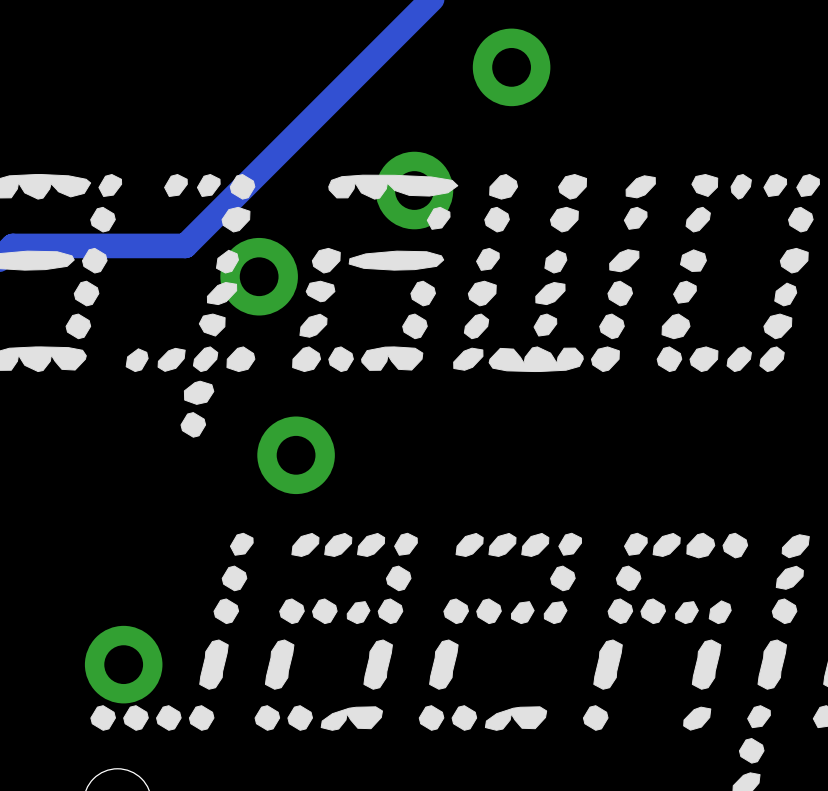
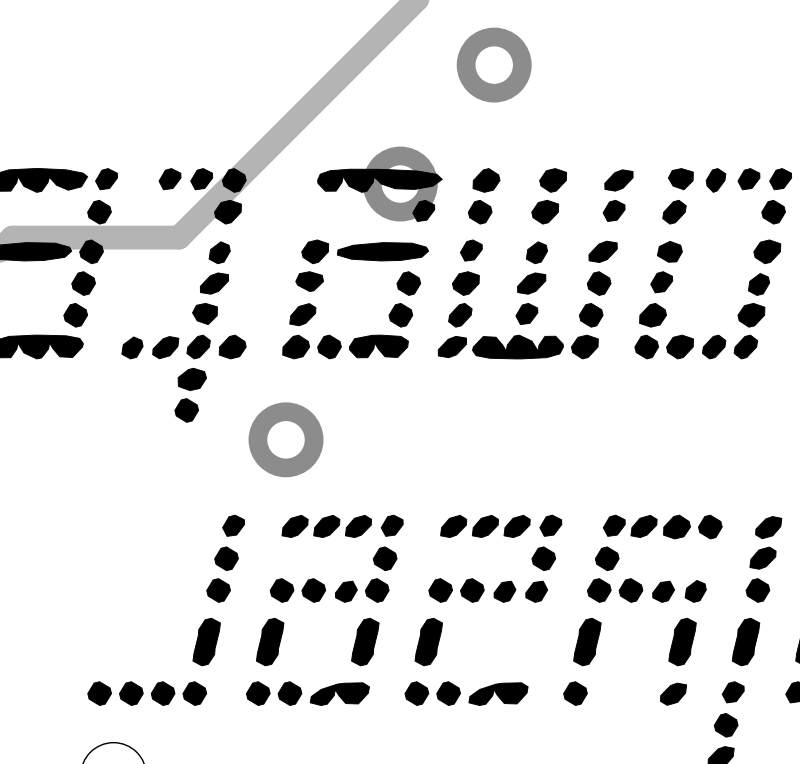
via: (259, 276) -> none
via: (123, 664) -> none

